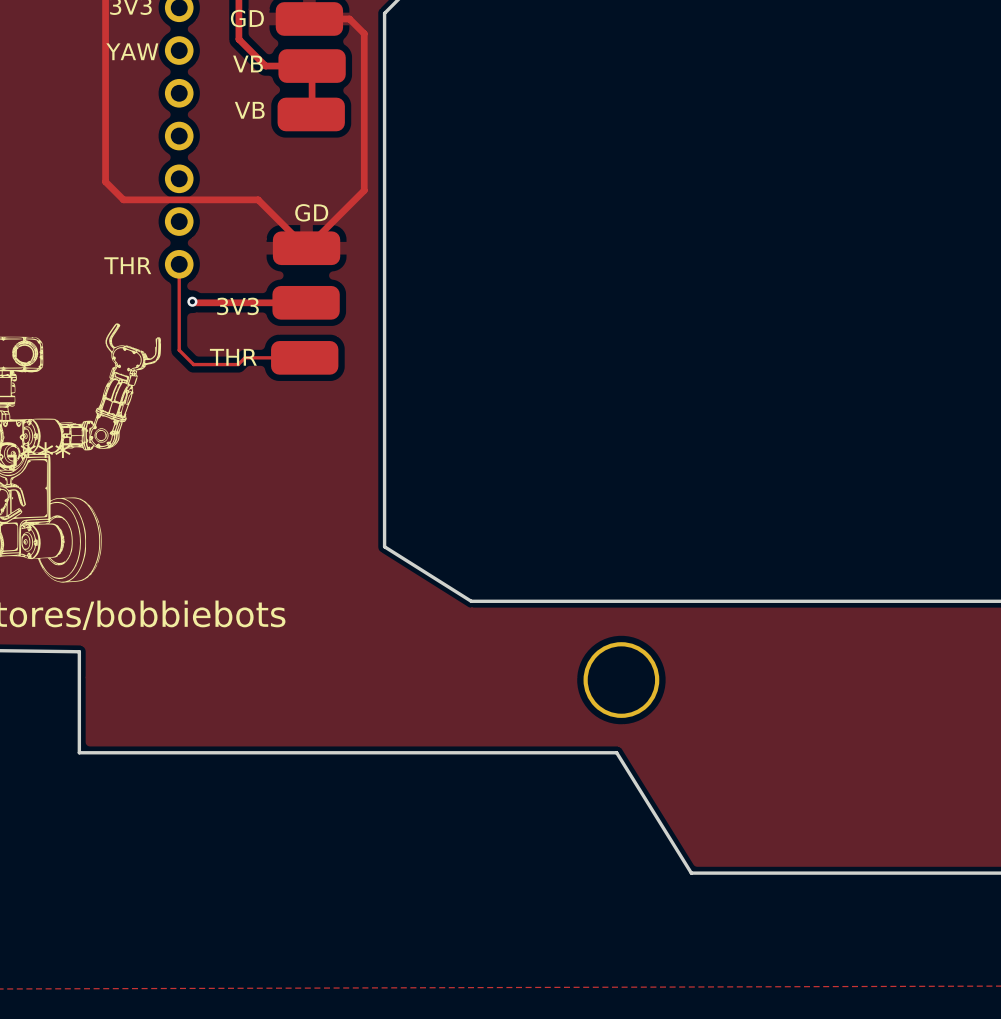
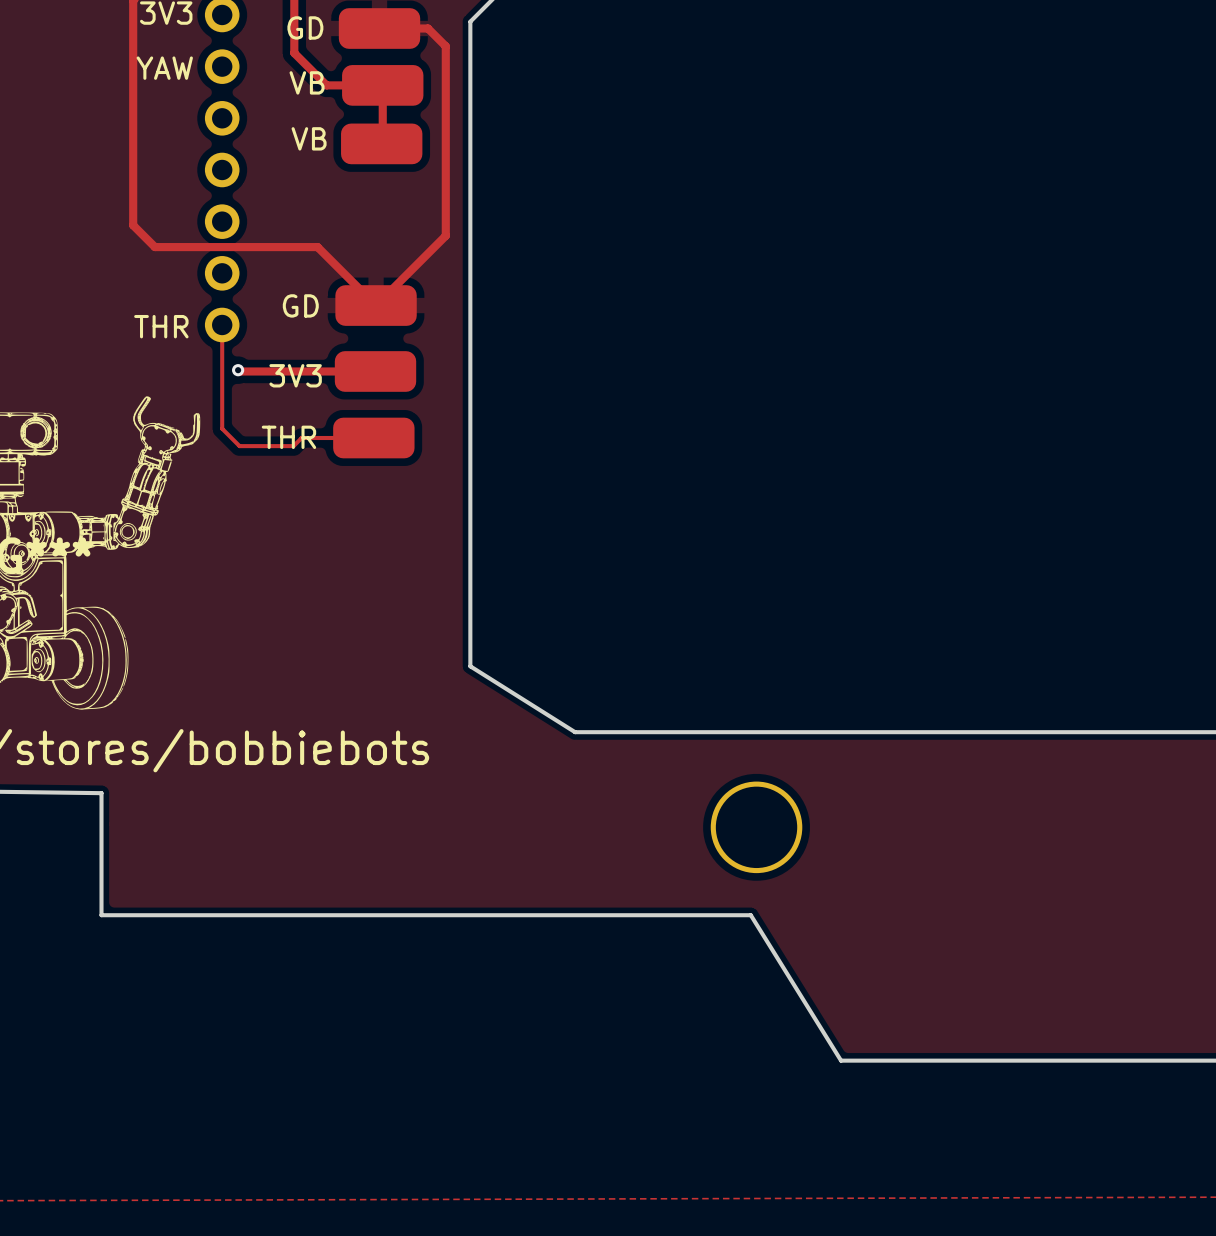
text position: GD (311, 212) -> GD (300, 305)

